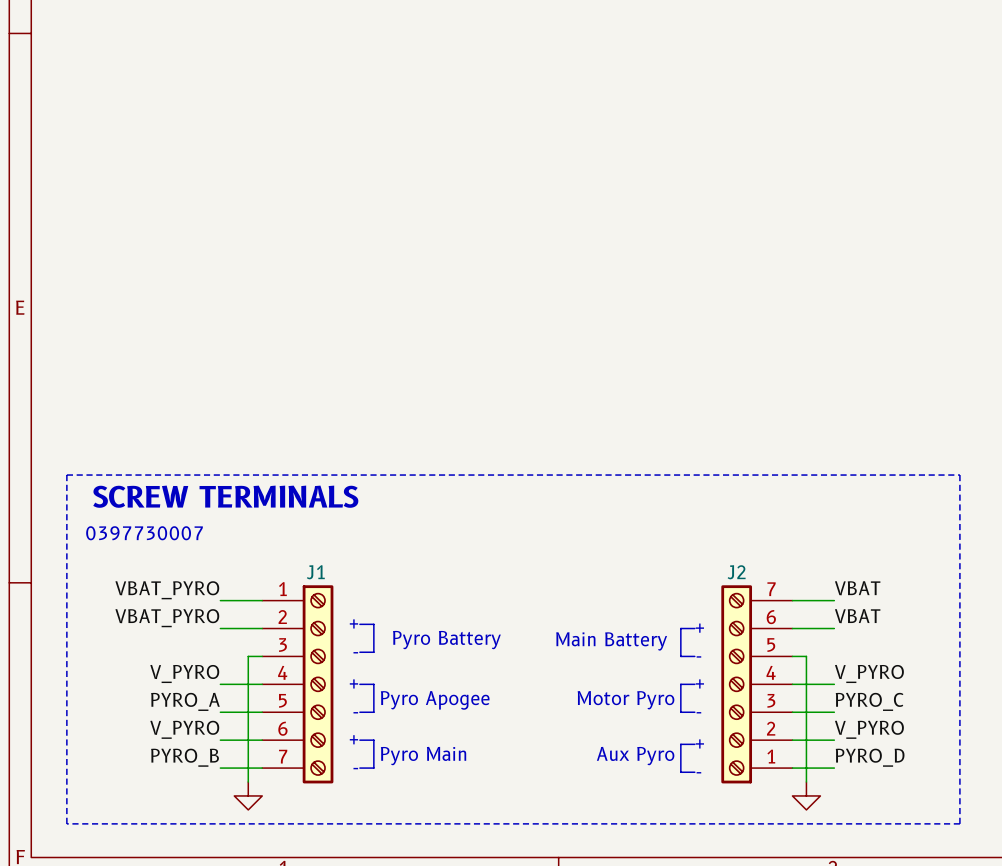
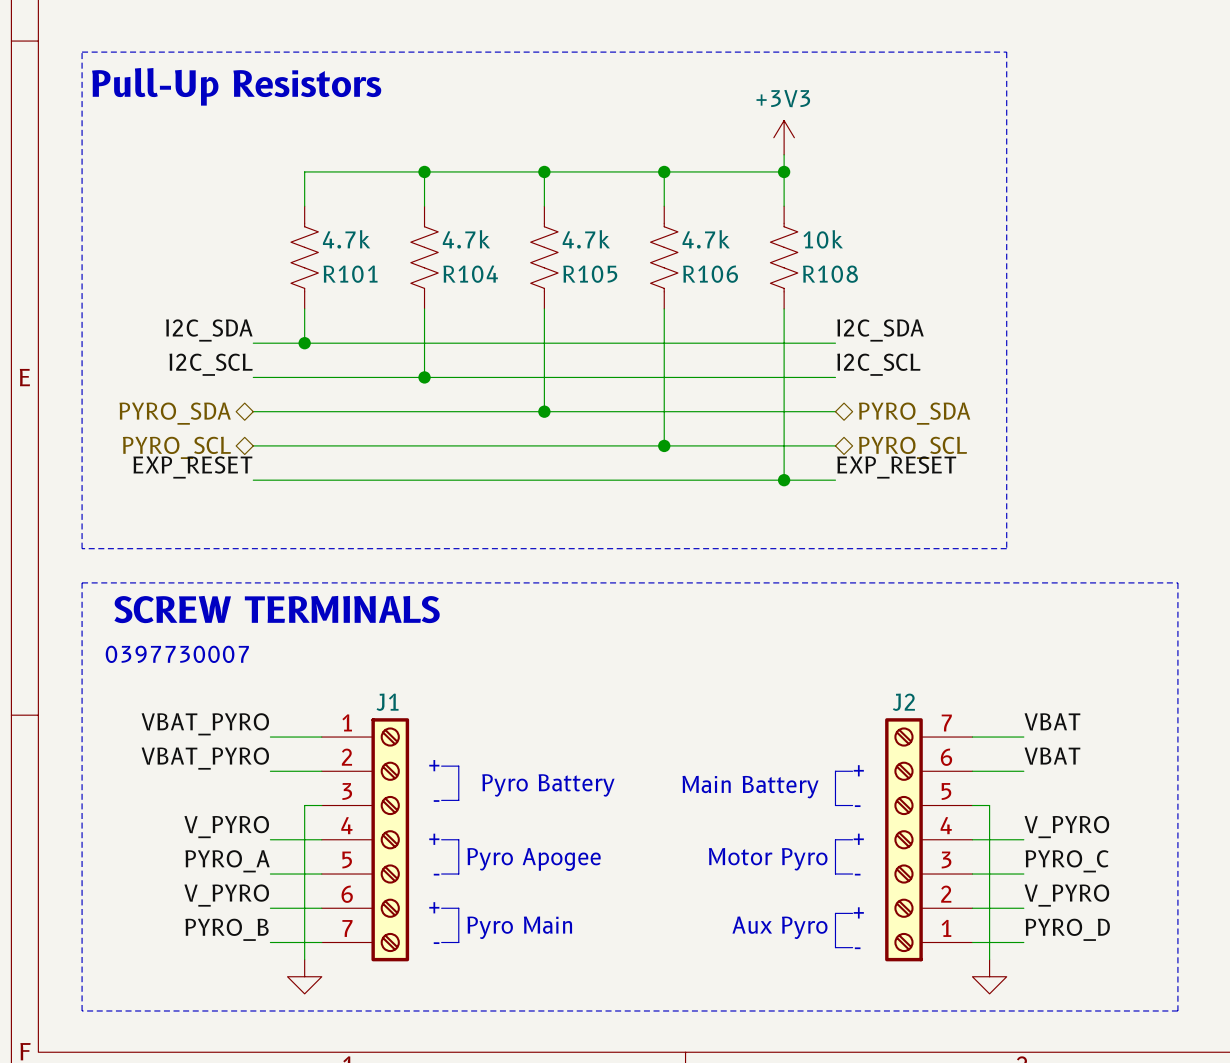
line: none -> (82, 52) (1006, 52) (1006, 548) (82, 548) (82, 52)
text: none -> Pull-Up Resistors (236, 86)
power symbol: none -> +3V3 (784, 137)
wire: none -> (784, 154) (784, 206)
wire: none -> (424, 171) (424, 206)
junction: none -> (424, 171)
wire: none -> (544, 171) (544, 206)
junction: none -> (544, 171)
wire: none -> (664, 171) (664, 206)
junction: none -> (664, 171)
wire: none -> (784, 171) (304, 171) (304, 206)
junction: none -> (784, 171)
R101: none -> 4.7k (304, 257)
R104: none -> 4.7k (424, 257)
R105: none -> 4.7k (544, 257)
R106: none -> 4.7k (664, 257)
R108: none -> 10k (784, 257)
wire: none -> (304, 308) (304, 343)
wire: none -> (424, 308) (424, 377)
wire: none -> (544, 308) (544, 411)
wire: none -> (664, 308) (664, 445)
wire: none -> (784, 308) (784, 480)
label: none -> I2C_SDA (209, 330)
label: none -> I2C_SDA (880, 330)
wire: none -> (253, 343) (835, 343)
junction: none -> (304, 343)
label: none -> I2C_SCL (211, 364)
label: none -> I2C_SCL (878, 364)
wire: none -> (253, 377) (835, 377)
junction: none -> (424, 377)
wire: none -> (253, 411) (835, 411)
junction: none -> (544, 411)
hierarchical label: none -> PYRO_SDA (175, 413)
hierarchical label: none -> PYRO_SDA (914, 413)
wire: none -> (253, 445) (835, 445)
junction: none -> (664, 445)
hierarchical label: none -> PYRO_SCL (176, 447)
hierarchical label: none -> PYRO_SCL (912, 447)
label: none -> EXP_RESET (192, 467)
label: none -> EXP_RESET (896, 467)
wire: none -> (253, 480) (835, 480)
junction: none -> (784, 480)

